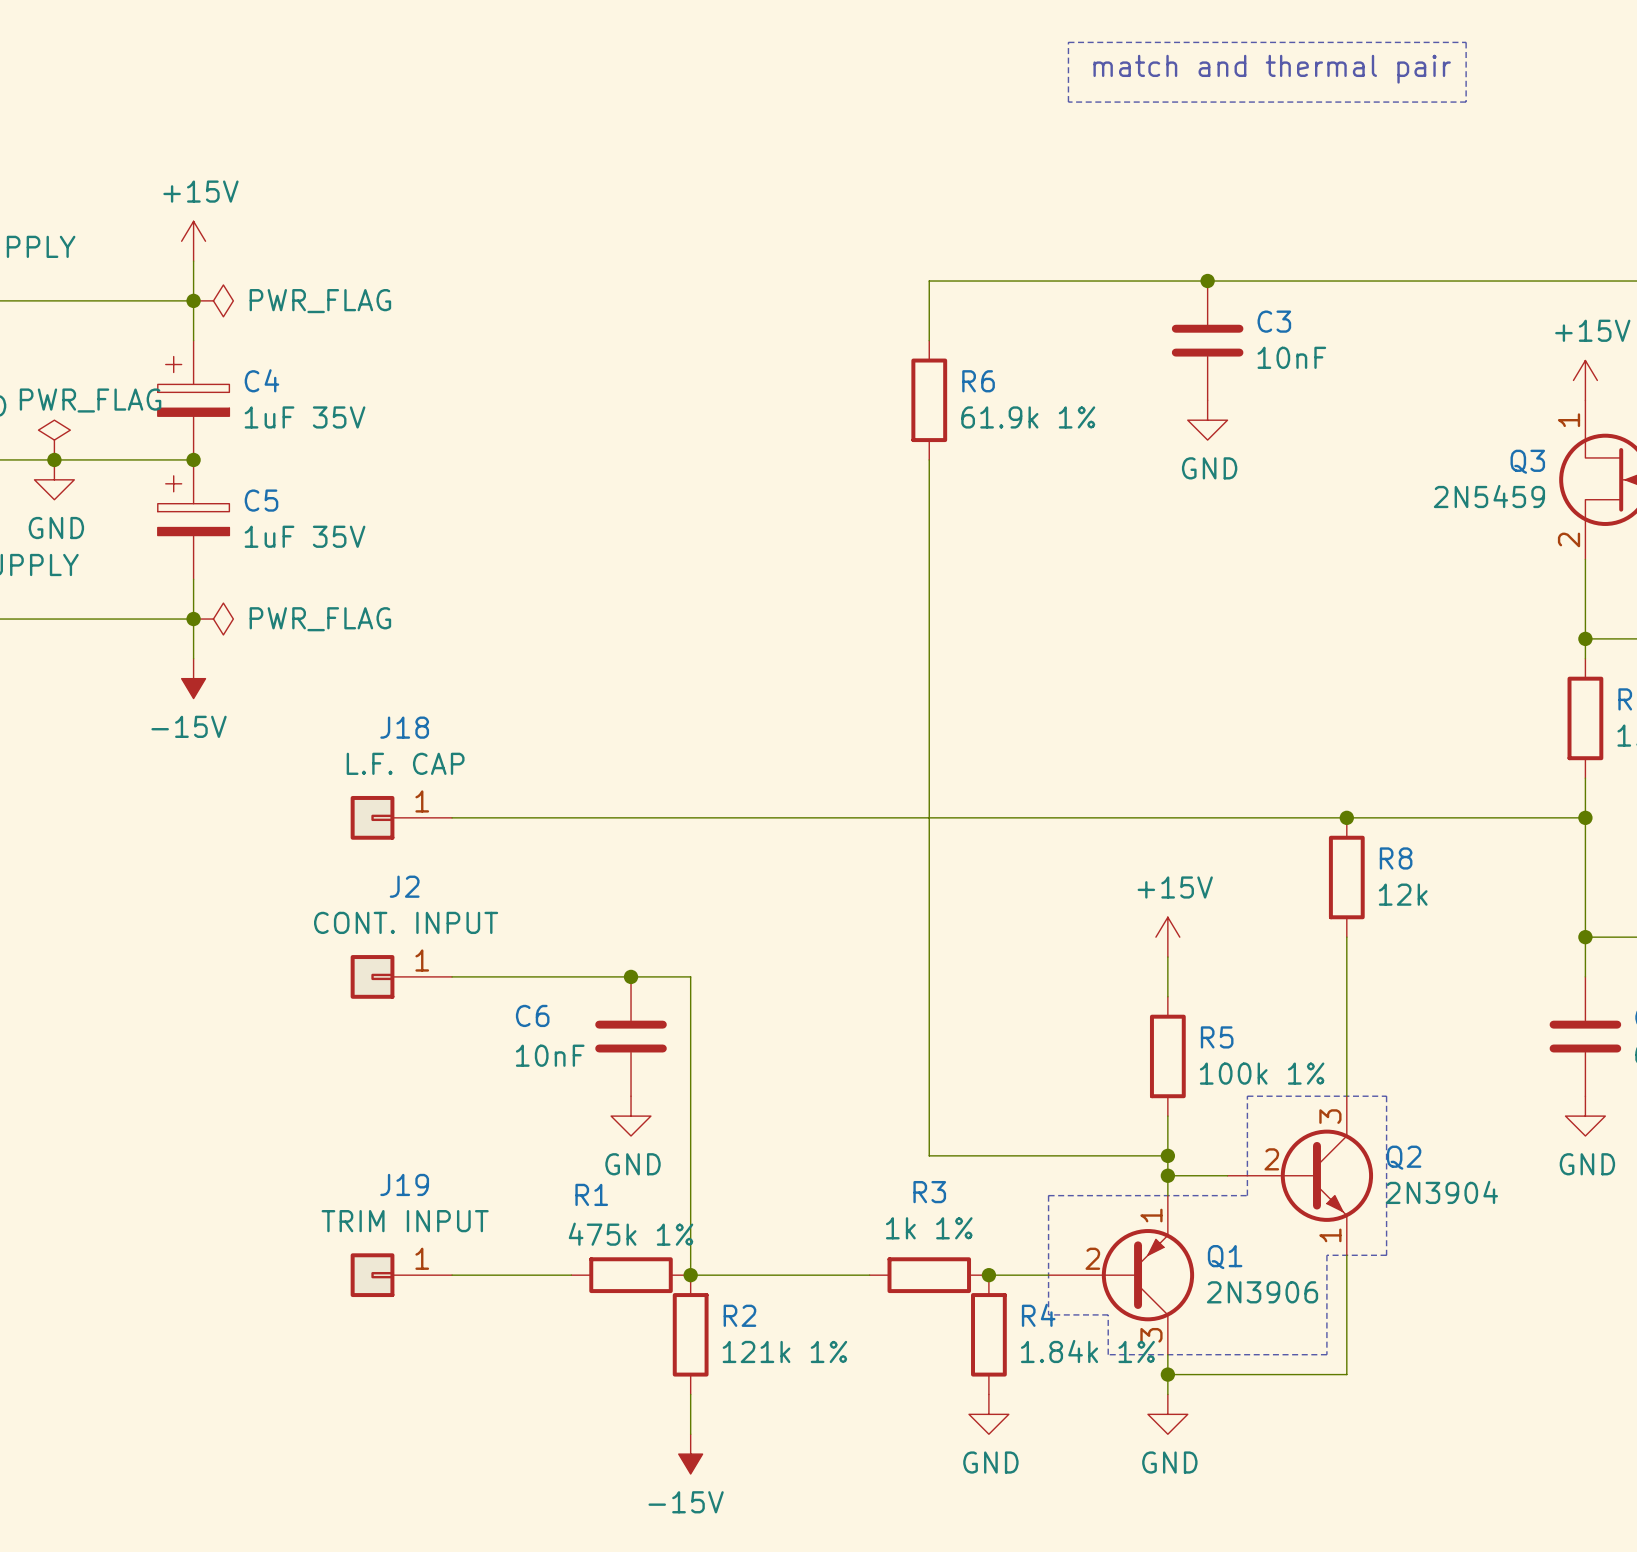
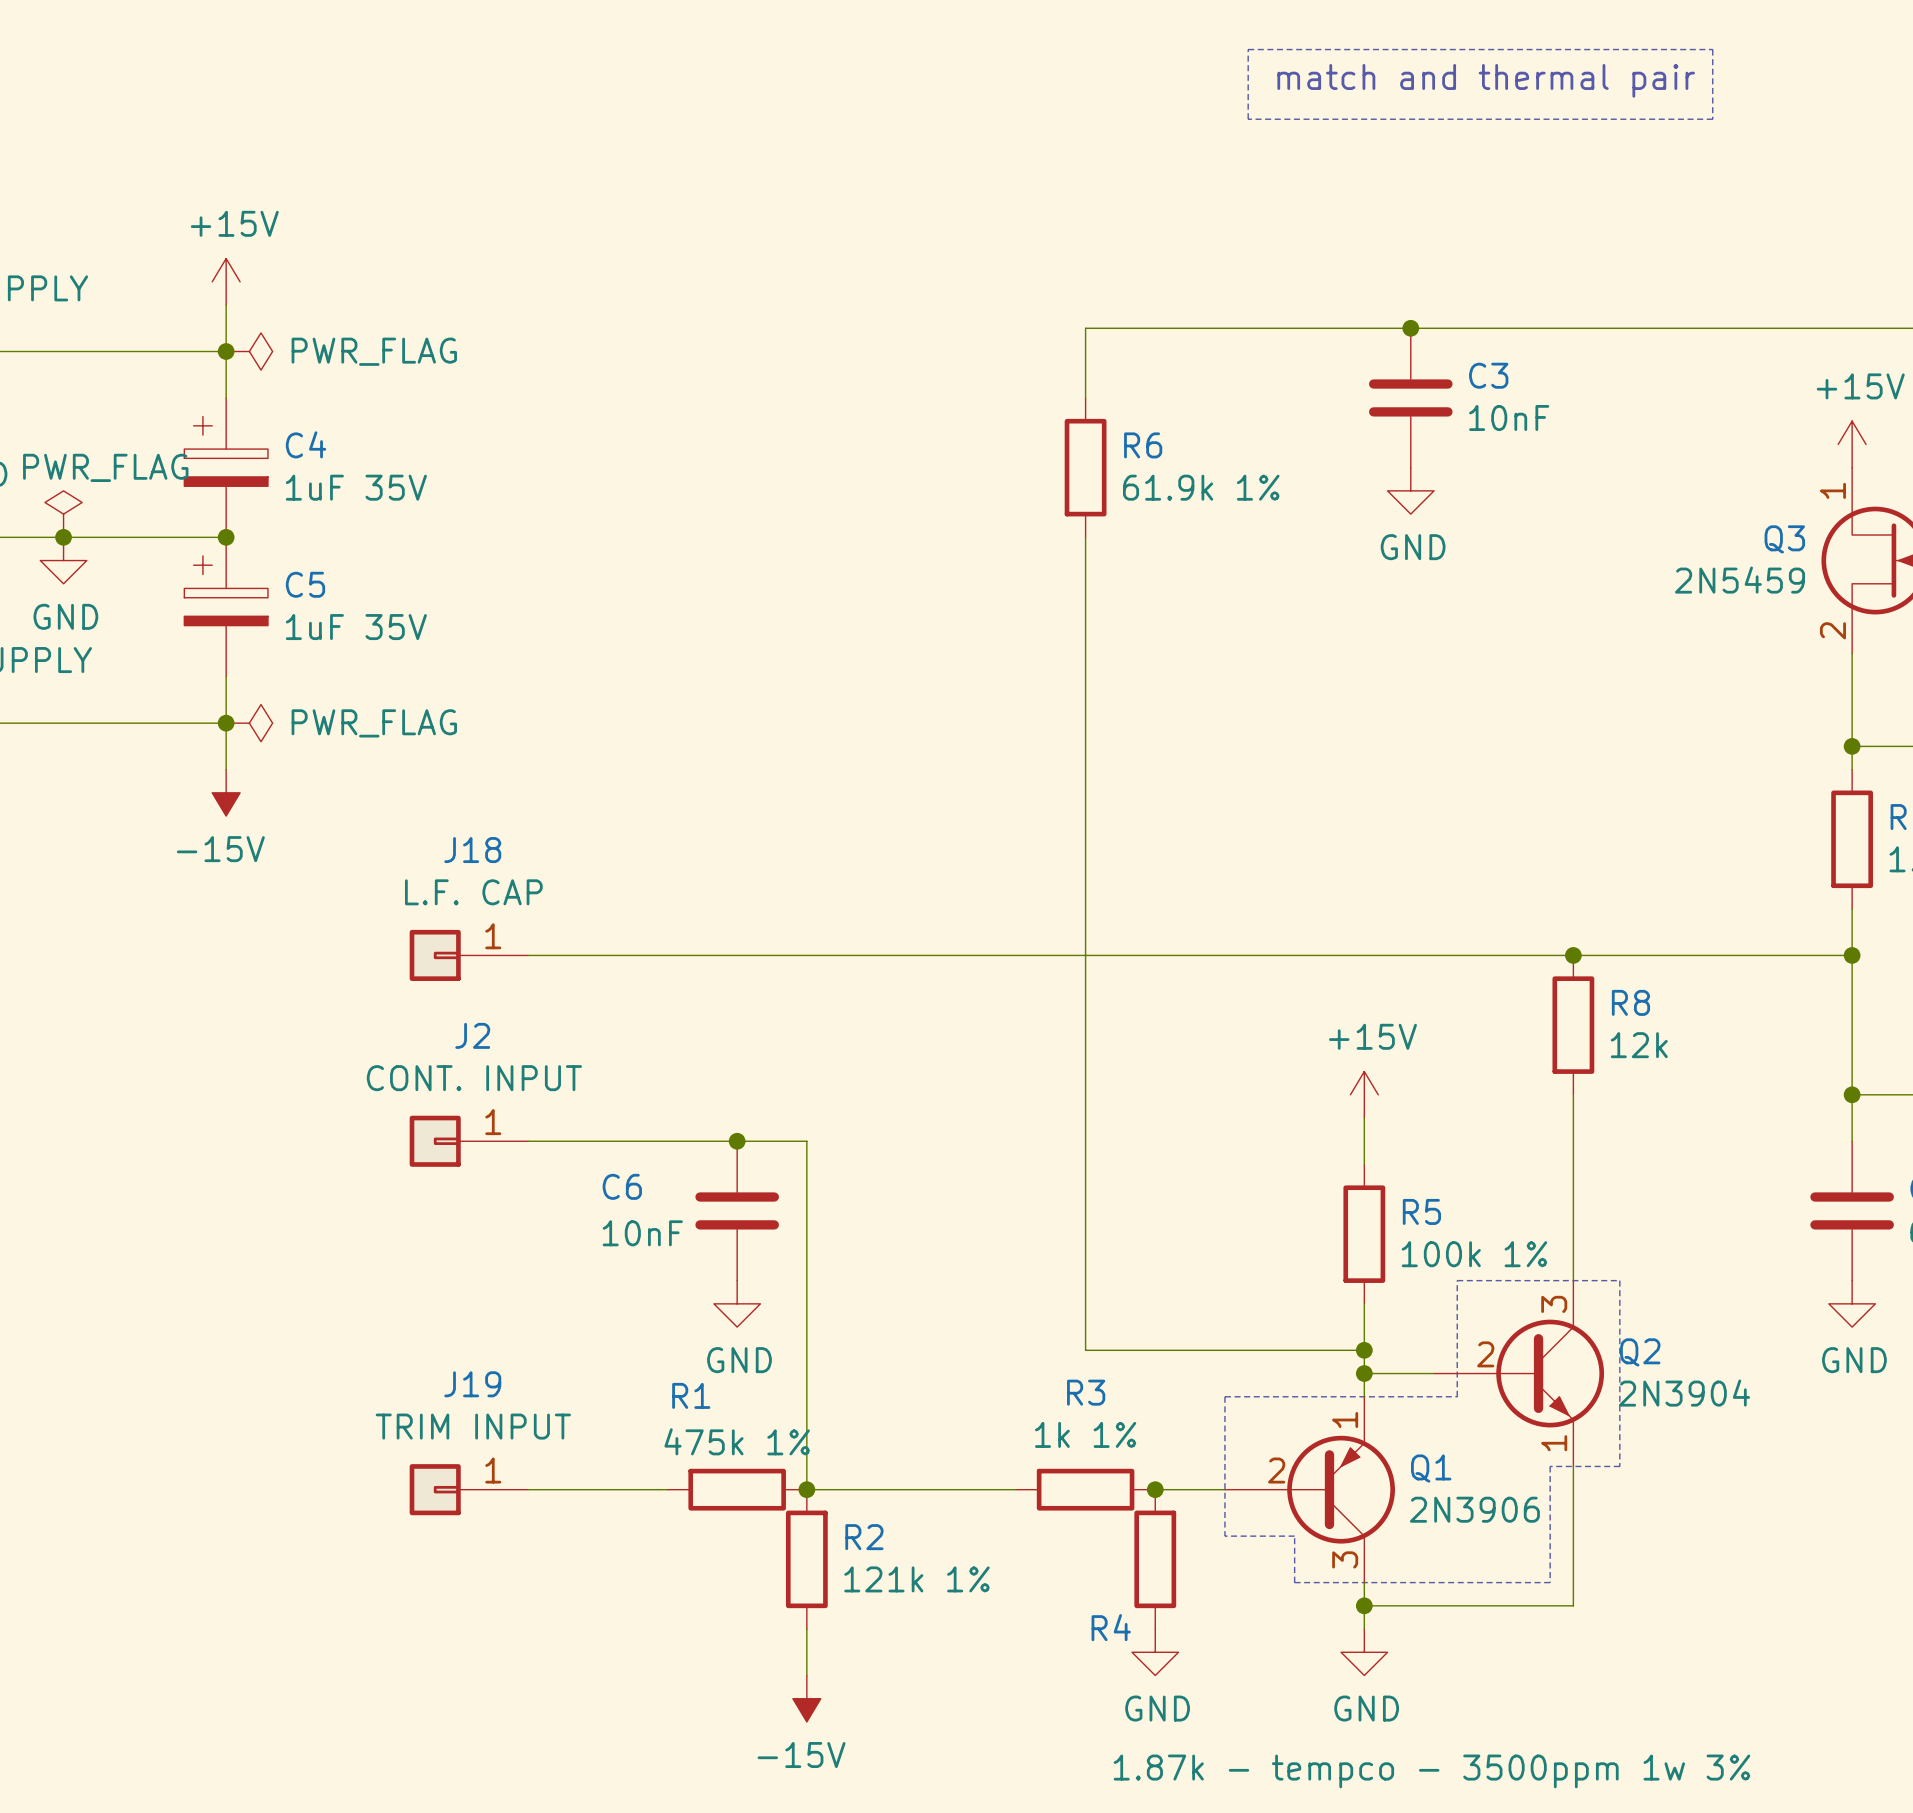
R4 name position: R4 (1038, 1315) -> R4 (1111, 1627)
R4 value: 1.84k 1% (1087, 1351) -> 1.87k - tempco - 3500ppm 1w 3% (1431, 1771)

